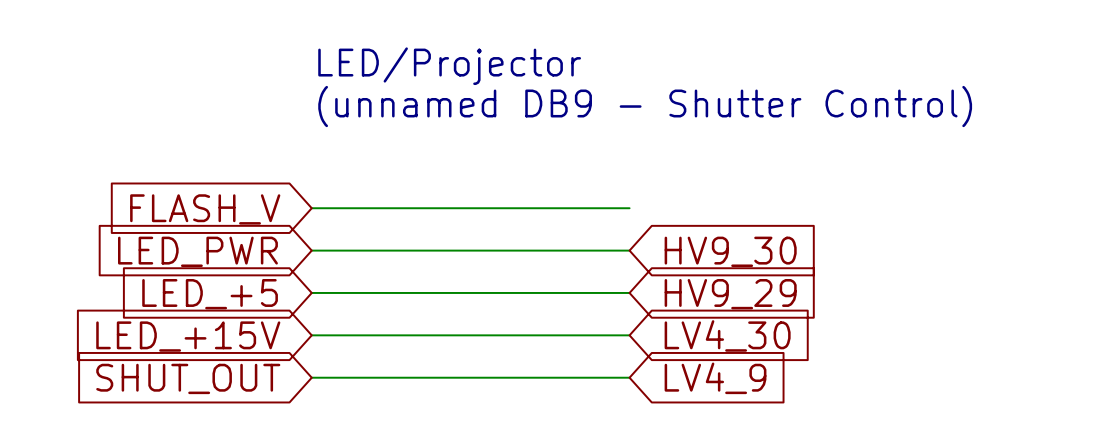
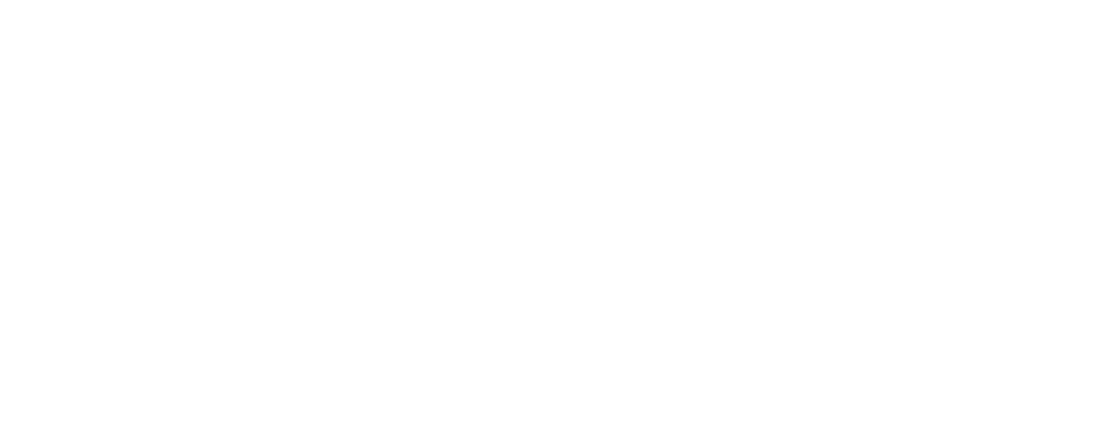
text: LED/Projector (449, 66) -> none
text: (unnamed DB9 - Shutter Control) (645, 106) -> none
wire: (311, 208) (629, 208) -> none
global label: FLASH_V (205, 209) -> none
wire: (311, 250) (629, 250) -> none
global label: LED_PWR (197, 251) -> none
global label: HV9_30 (730, 251) -> none
wire: (311, 292) (629, 292) -> none
global label: LED_+5 (210, 294) -> none
global label: HV9_29 (730, 294) -> none
wire: (311, 335) (629, 335) -> none
global label: LV4_30 (727, 335) -> none
global label: LED_+15V (188, 336) -> none
wire: (311, 377) (629, 377) -> none
global label: SHUT_OUT (188, 378) -> none
global label: LV4_9 (715, 378) -> none

